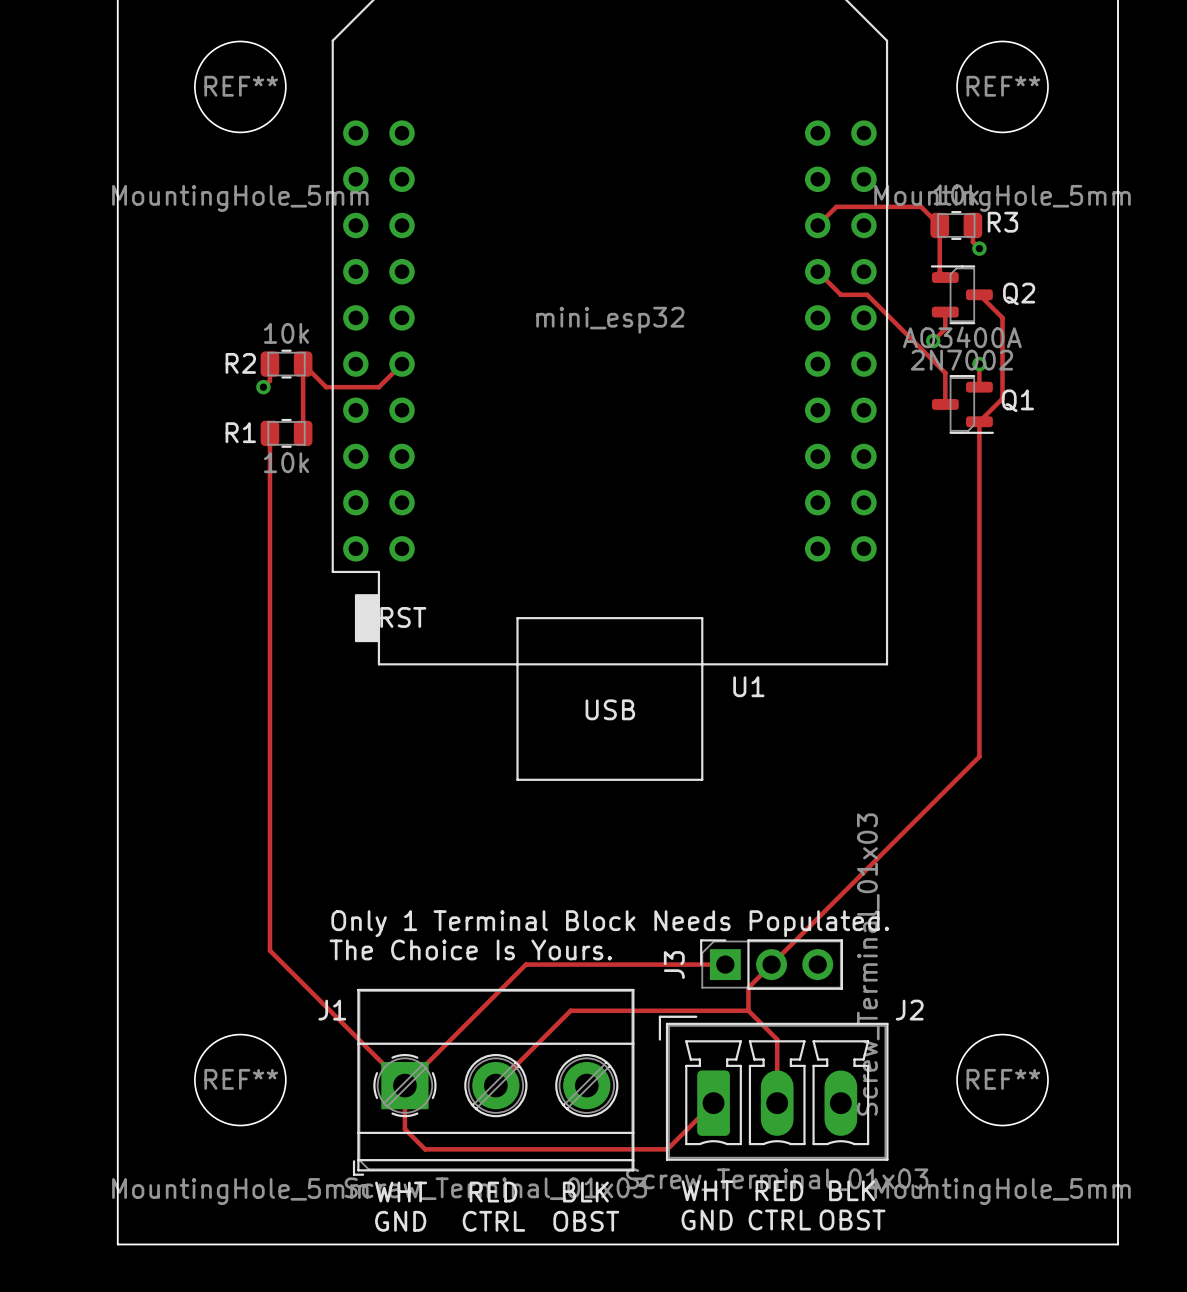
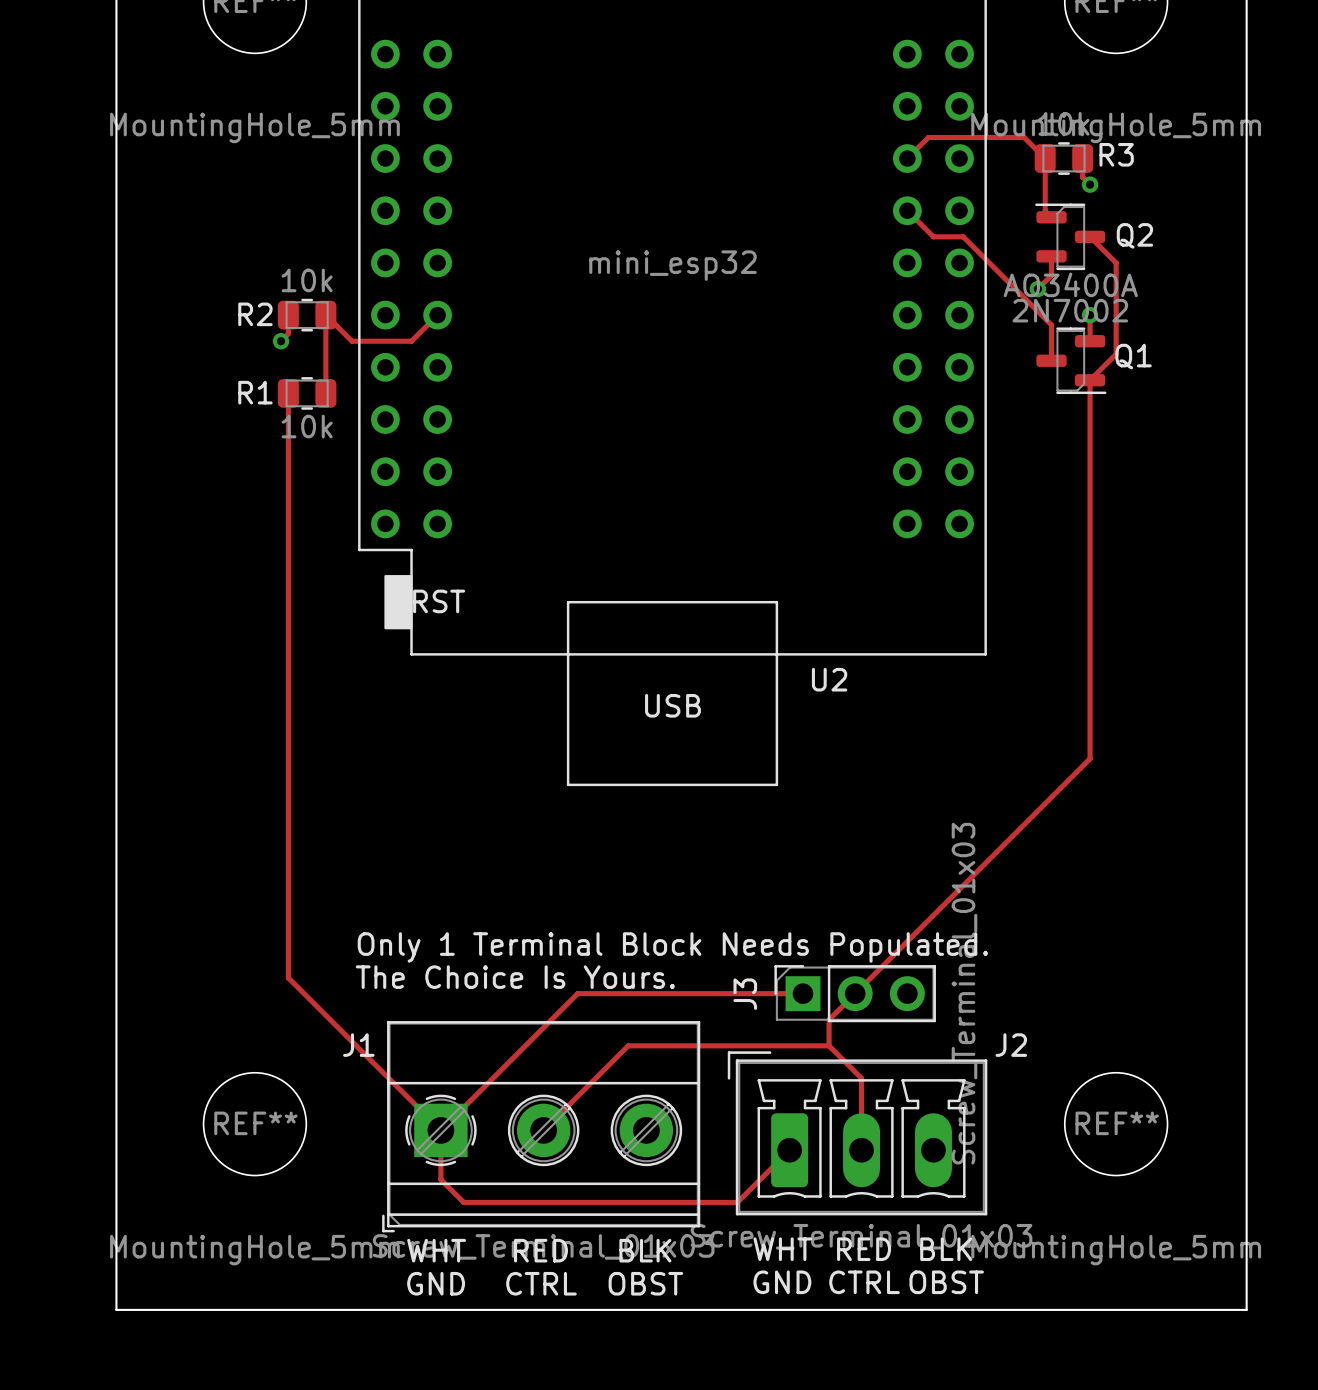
U1 name: U1 (748, 686) -> U2 (829, 679)

